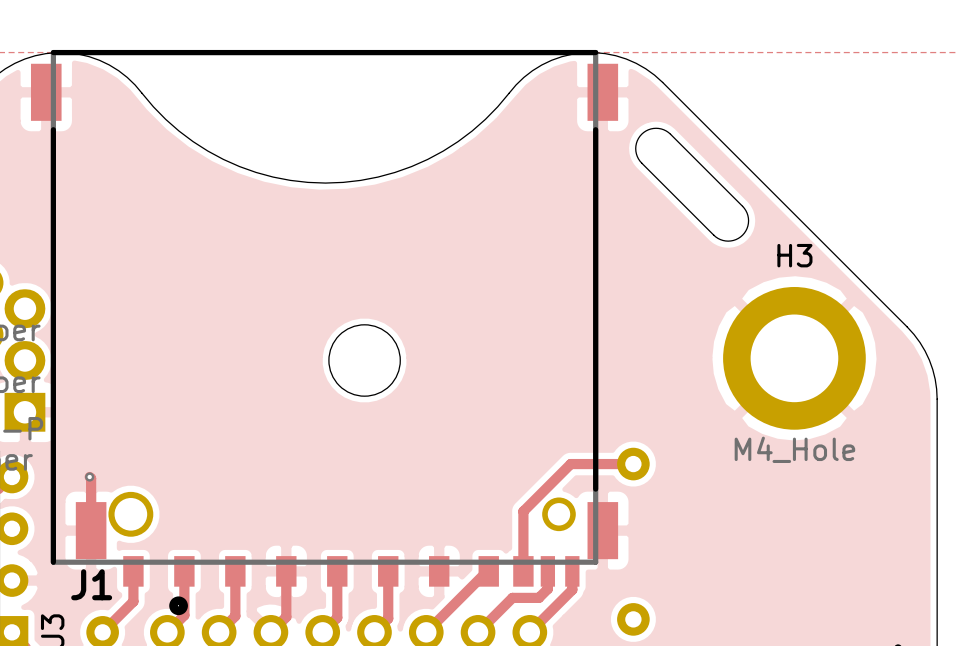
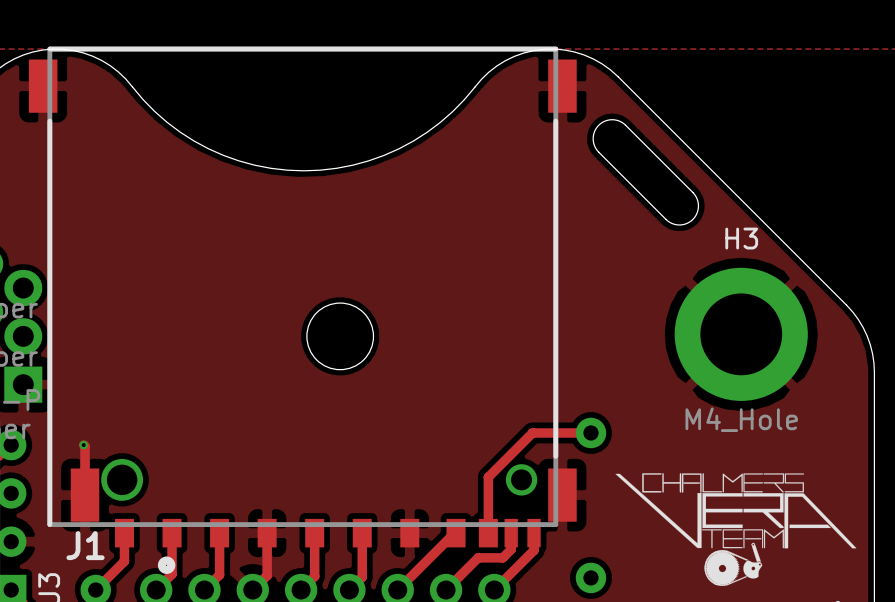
drawing: none -> [615, 473, 857, 586]

